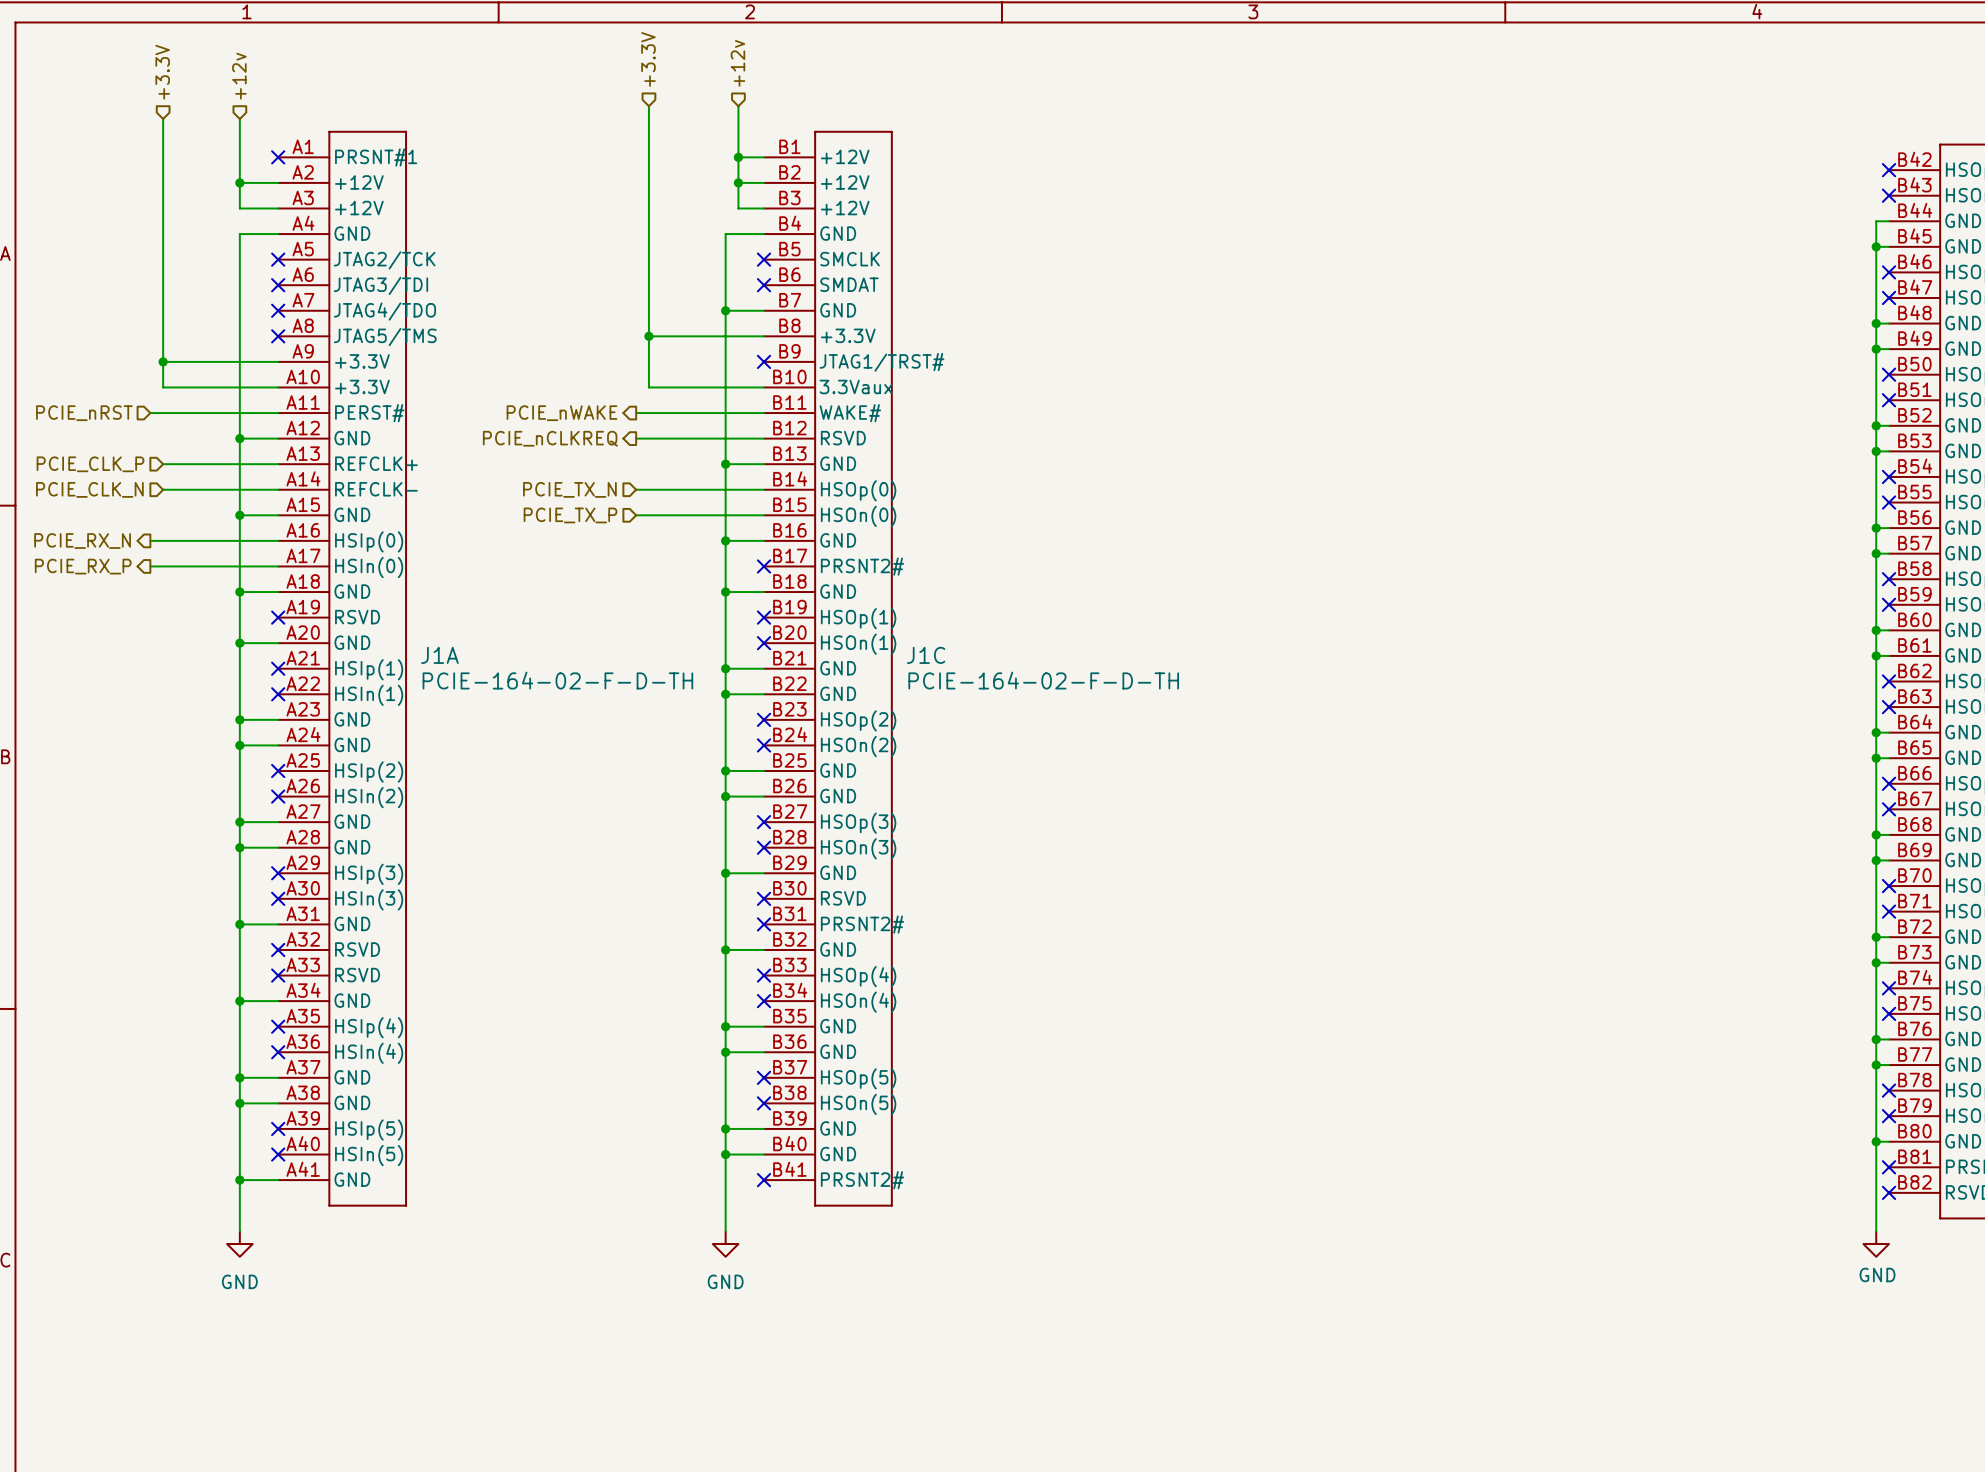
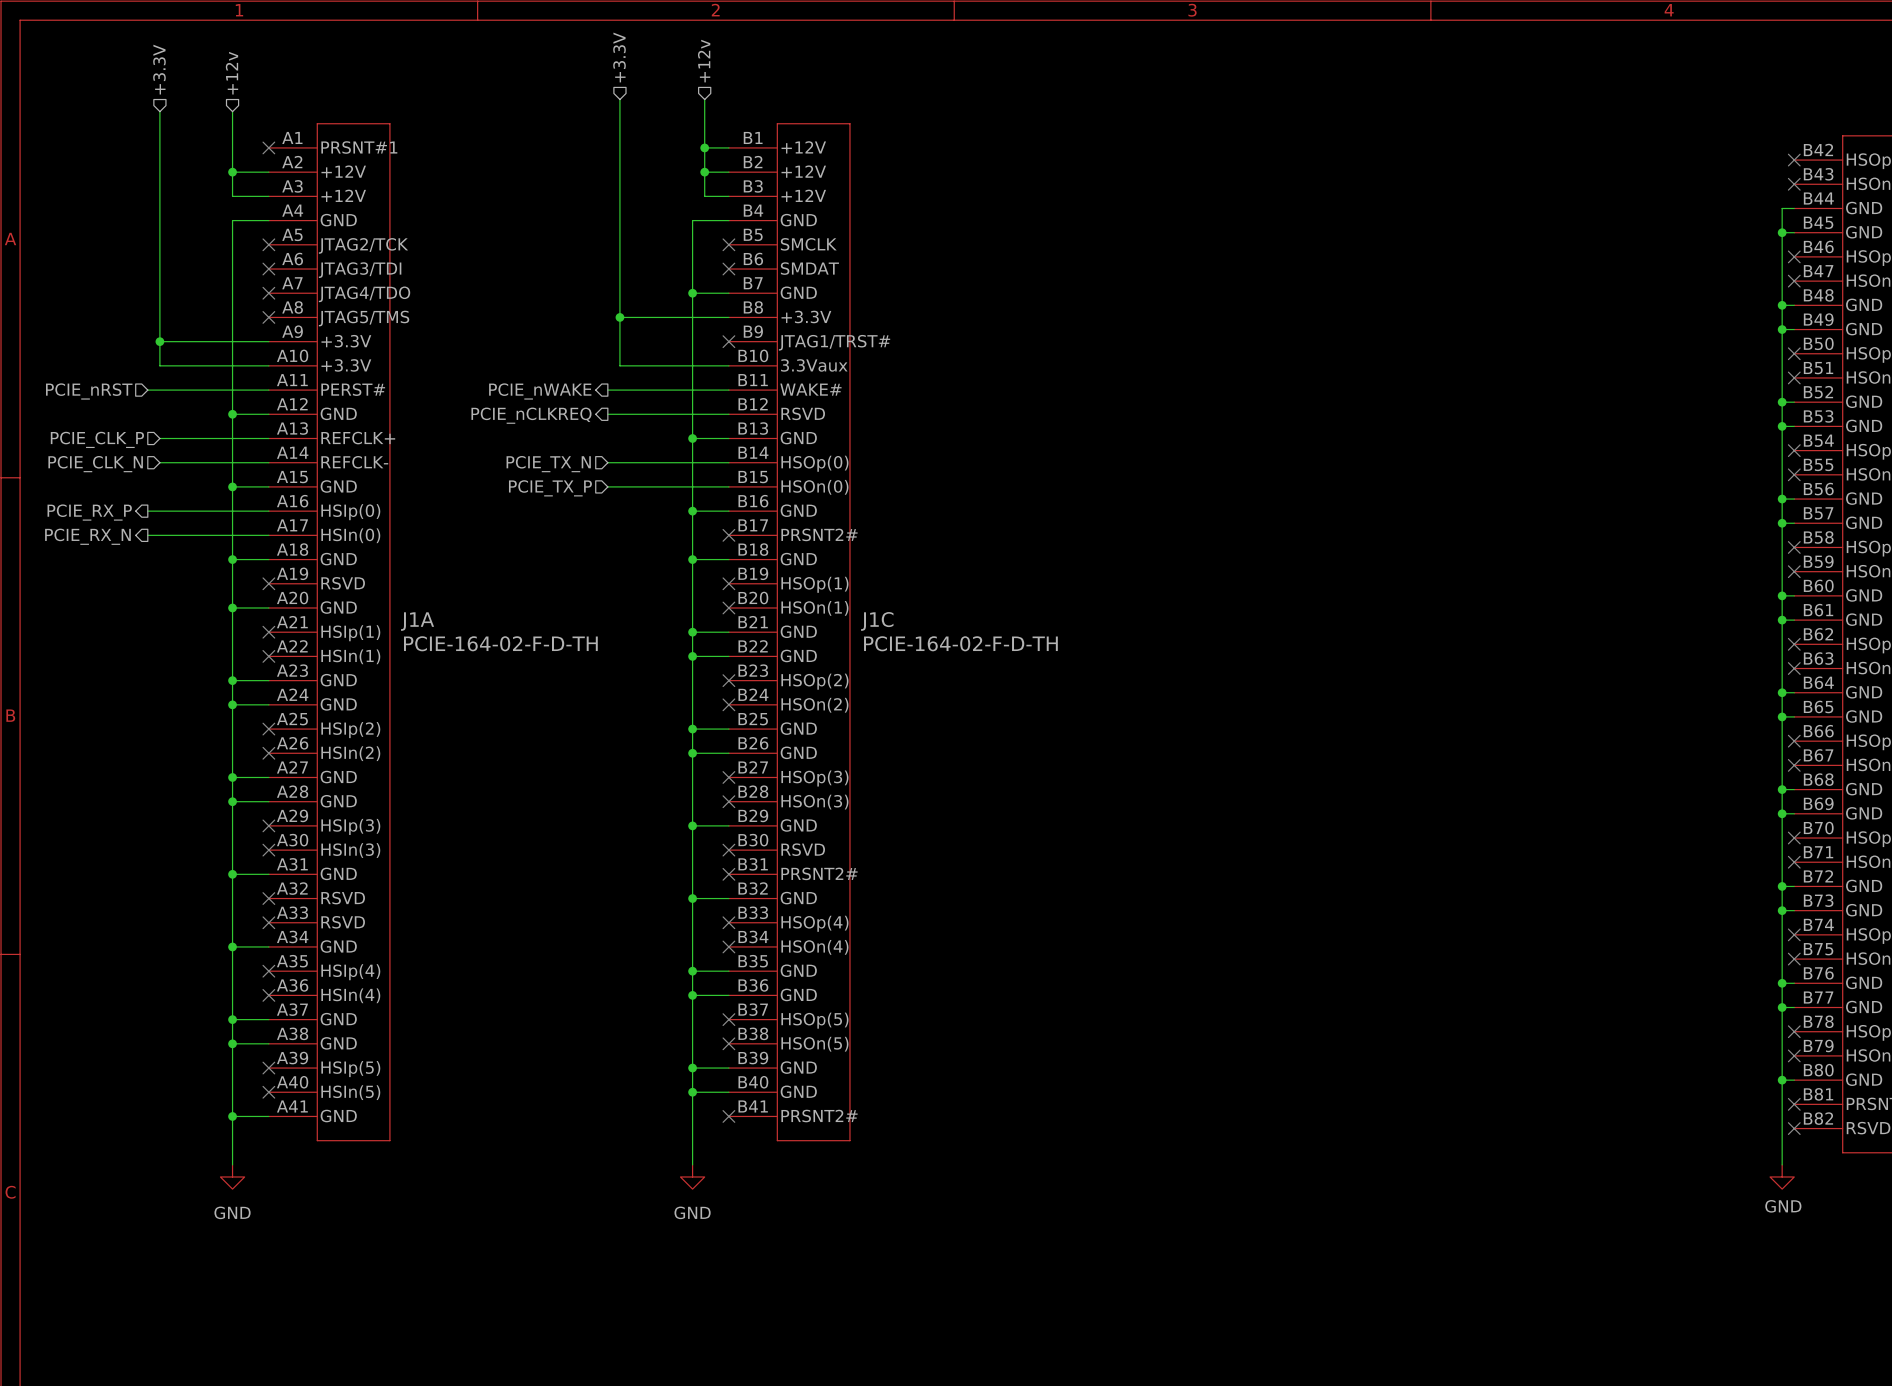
hierarchical label: PCIE_RX_N (82, 541) -> PCIE_RX_P (89, 512)
hierarchical label: PCIE_RX_P (83, 566) -> PCIE_RX_N (87, 536)

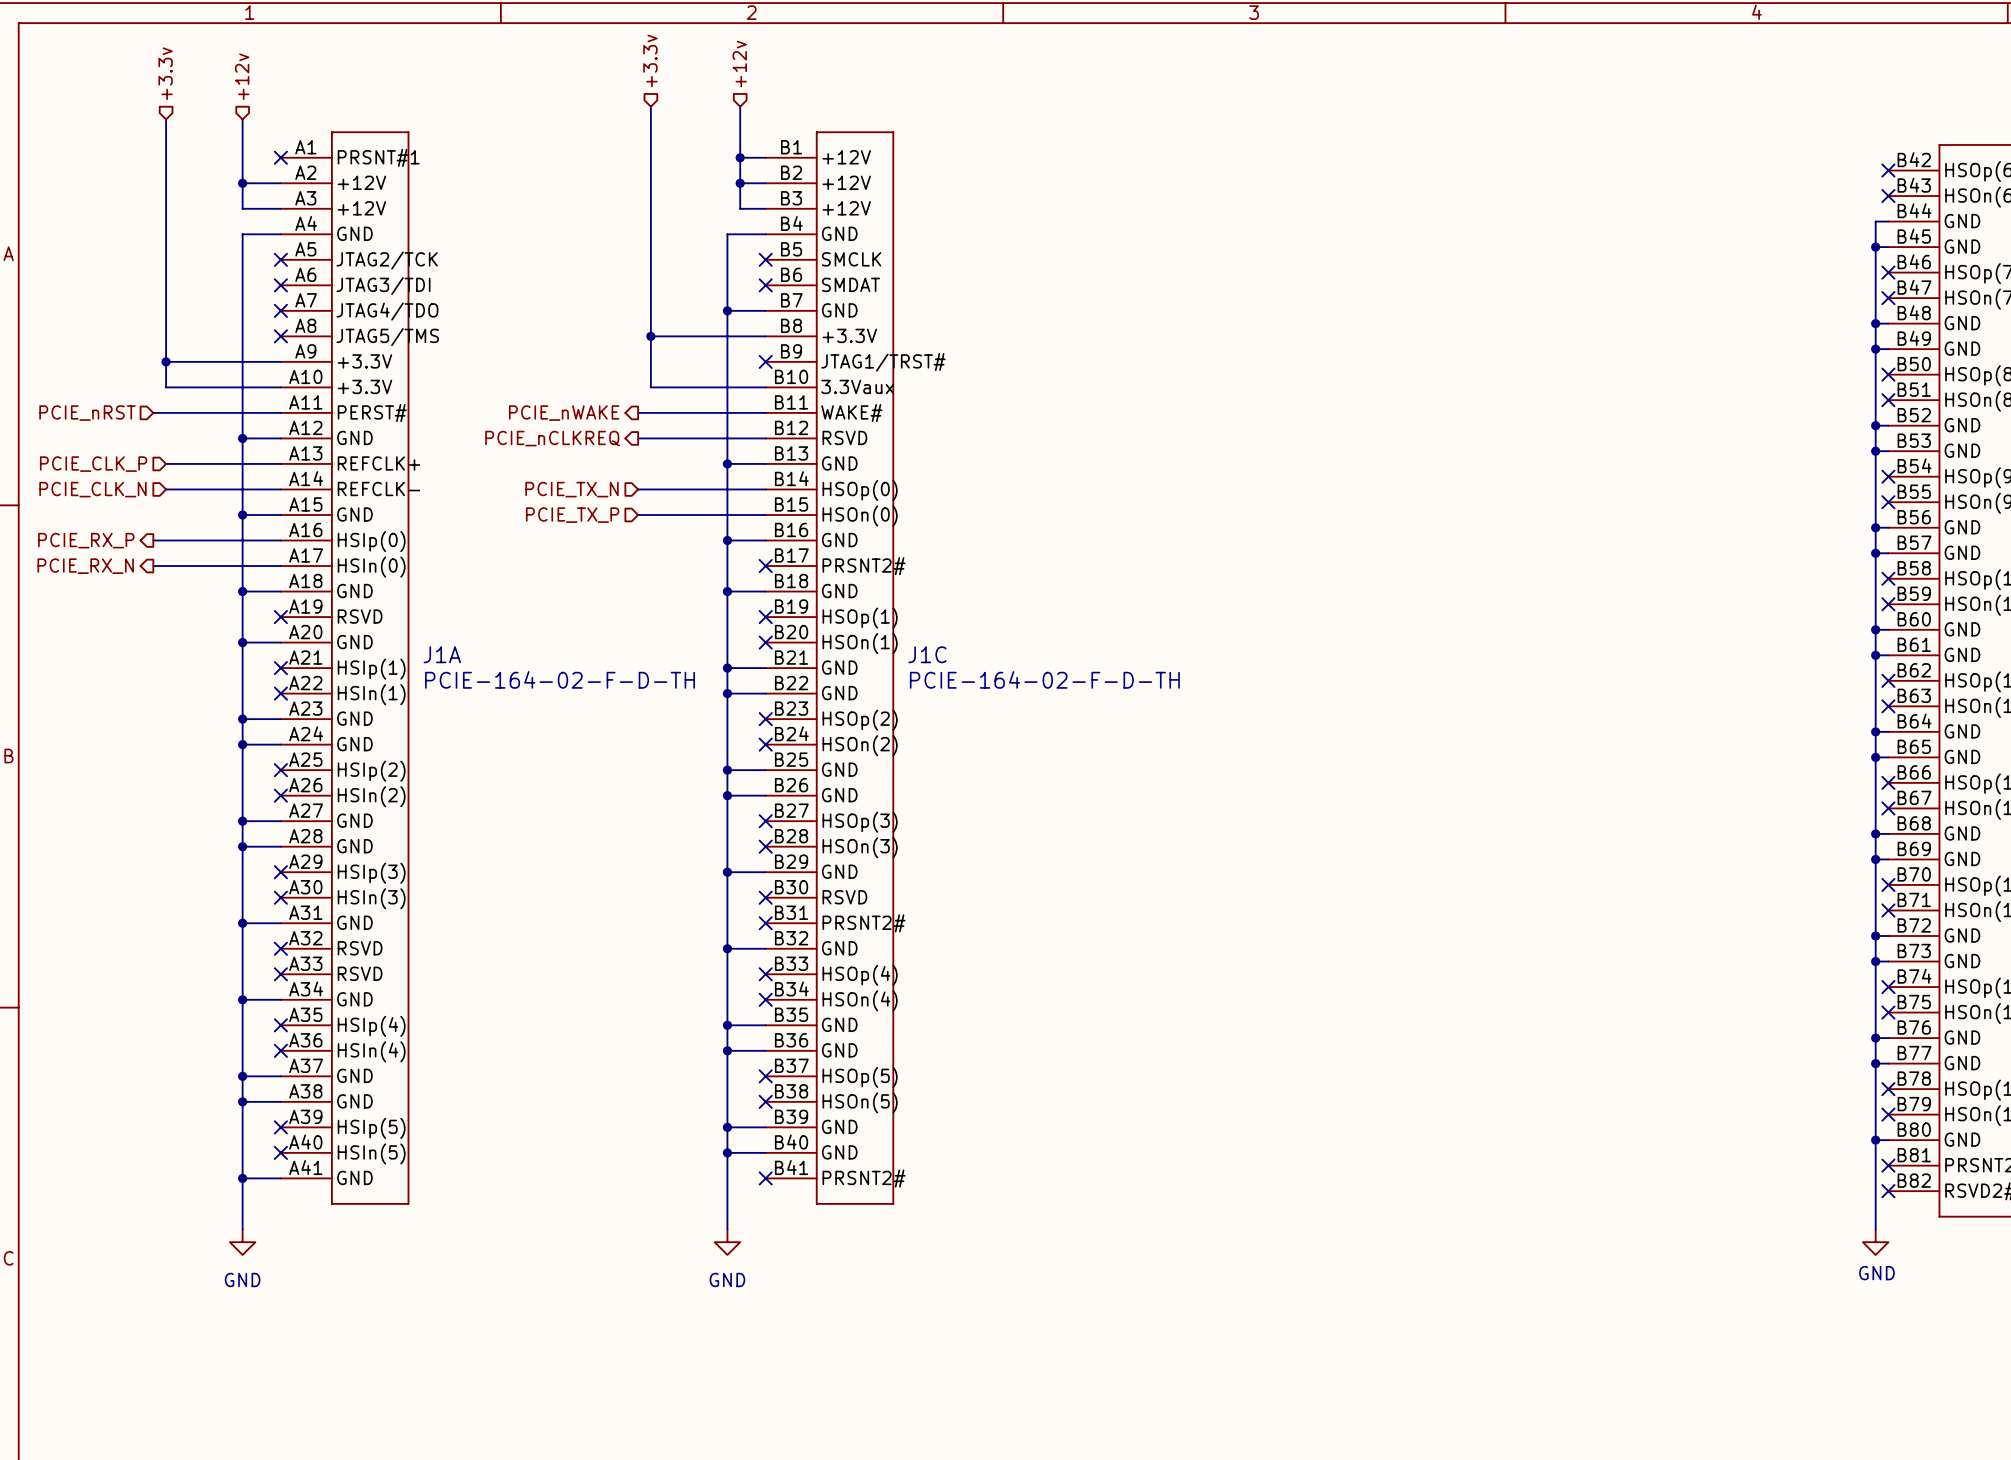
hierarchical label: +3.3V (619, 57) -> +3.3v (650, 60)
hierarchical label: +3.3V (159, 69) -> +3.3v (165, 73)

